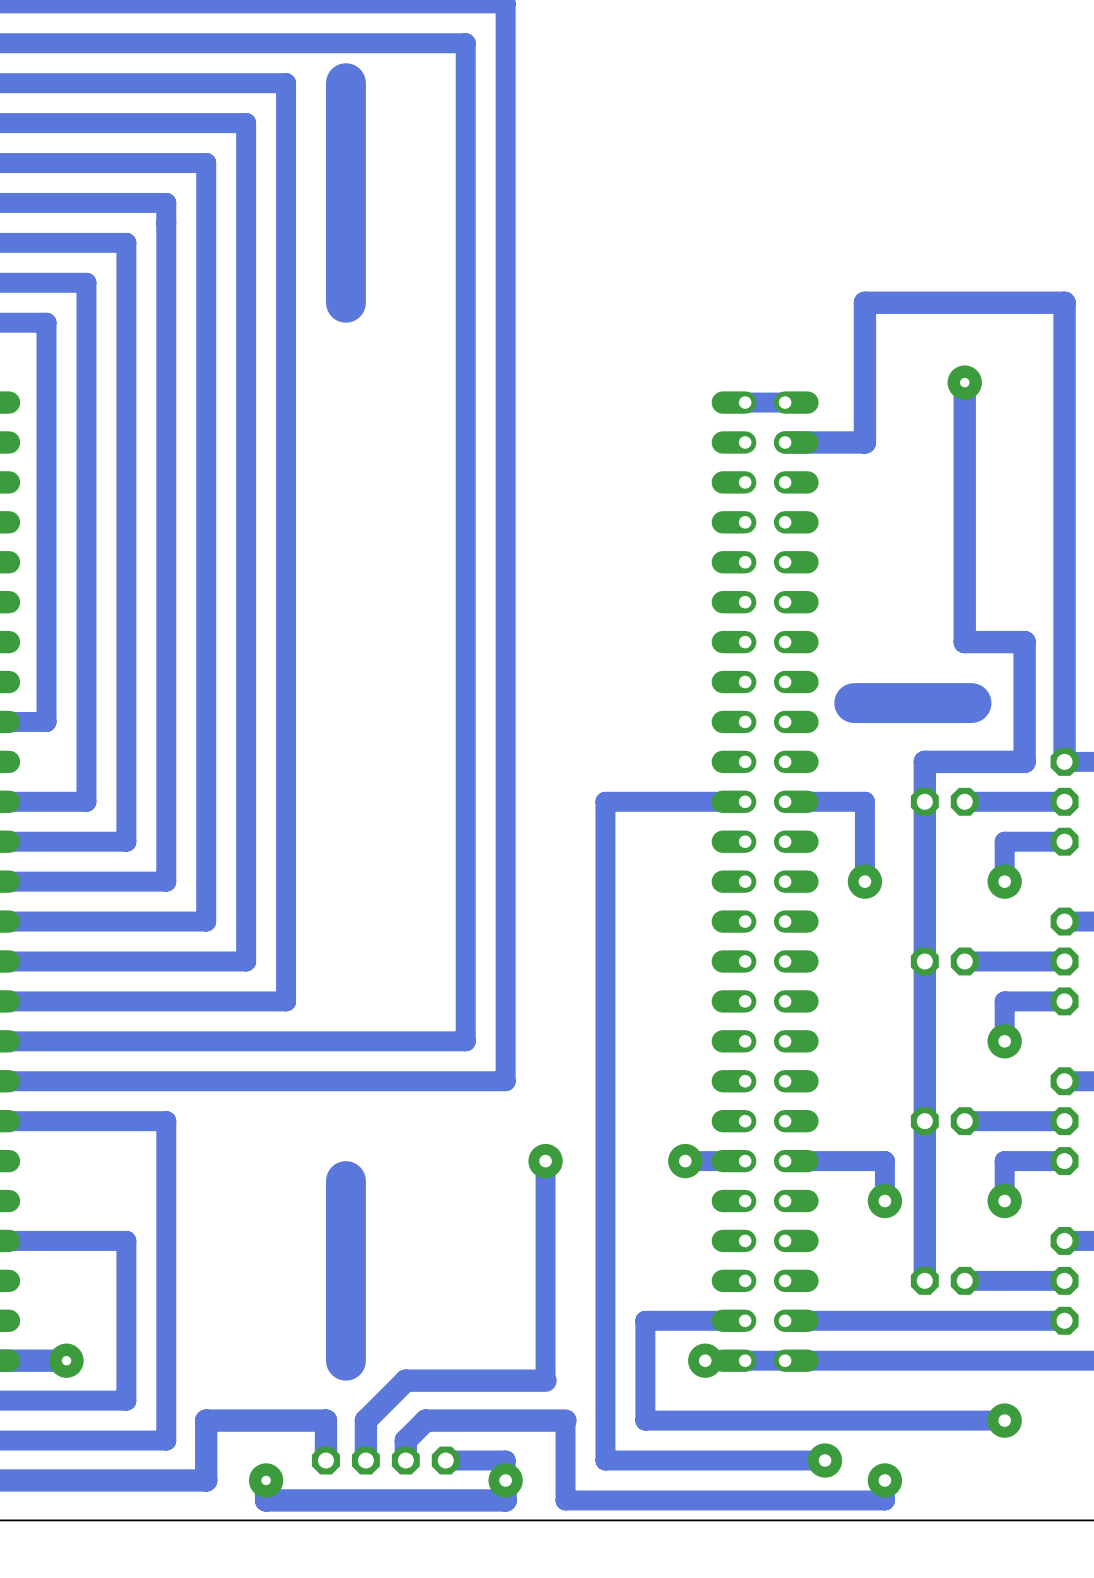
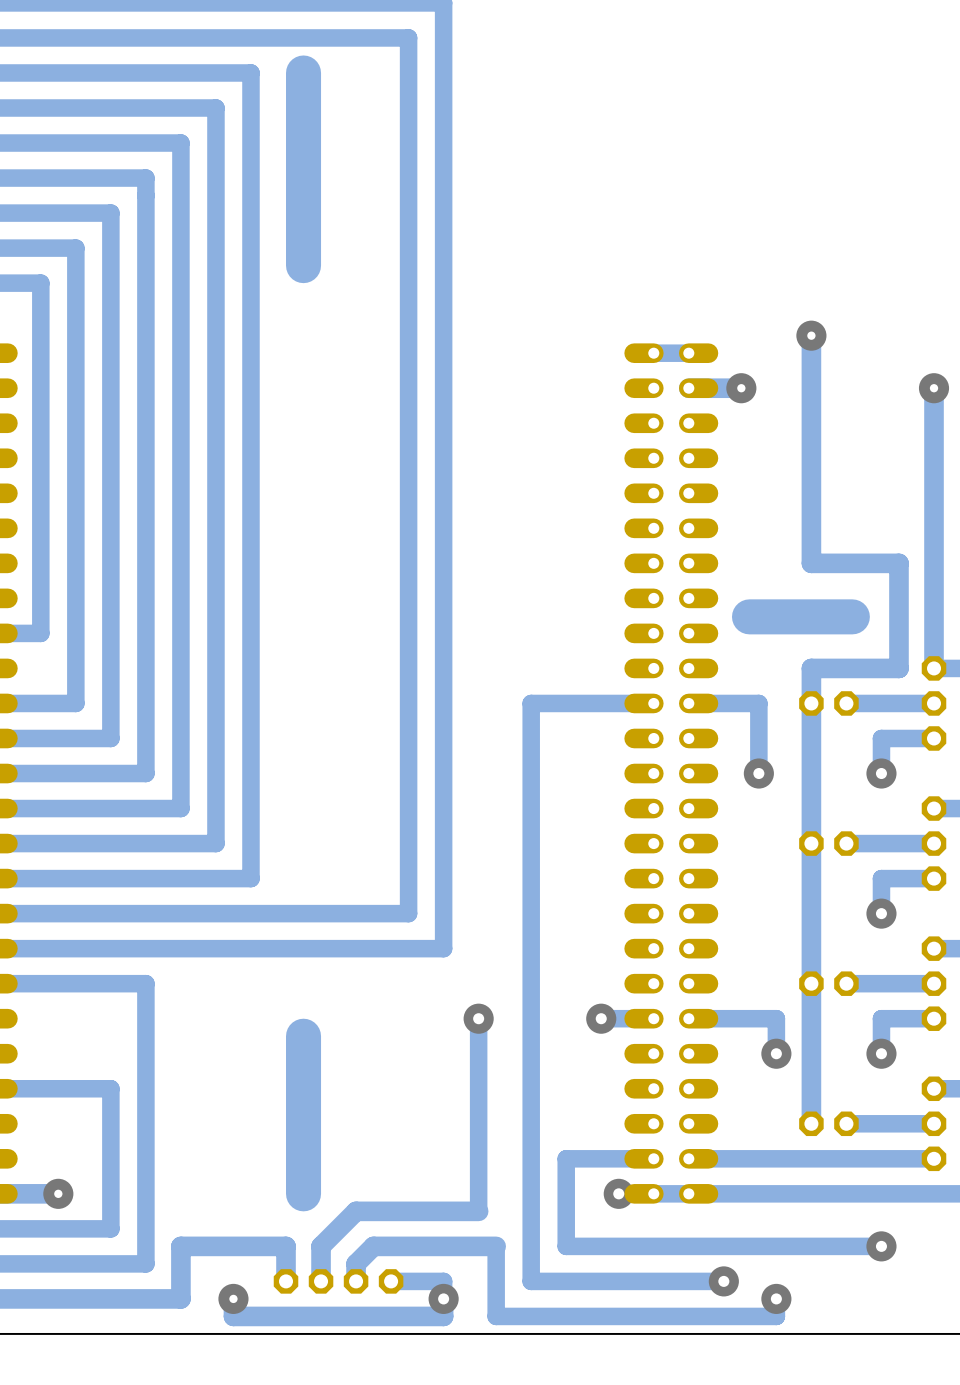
track: (964, 382) (964, 642) -> (811, 335) (811, 563) (846, 563)
via position: (964, 382) -> (811, 335)
via: none -> (741, 388)
track: (1064, 442) (1064, 302) (864, 302) (864, 442) (844, 442) -> none
via: none -> (934, 388)

